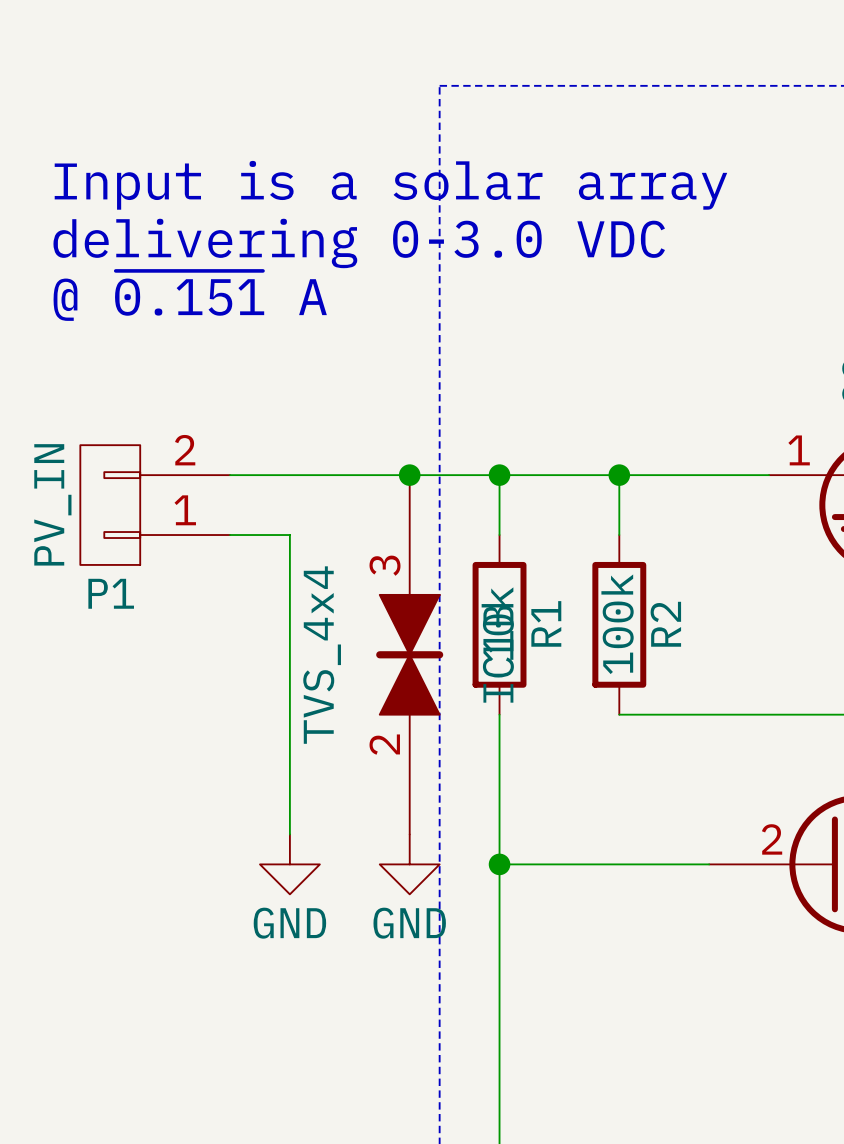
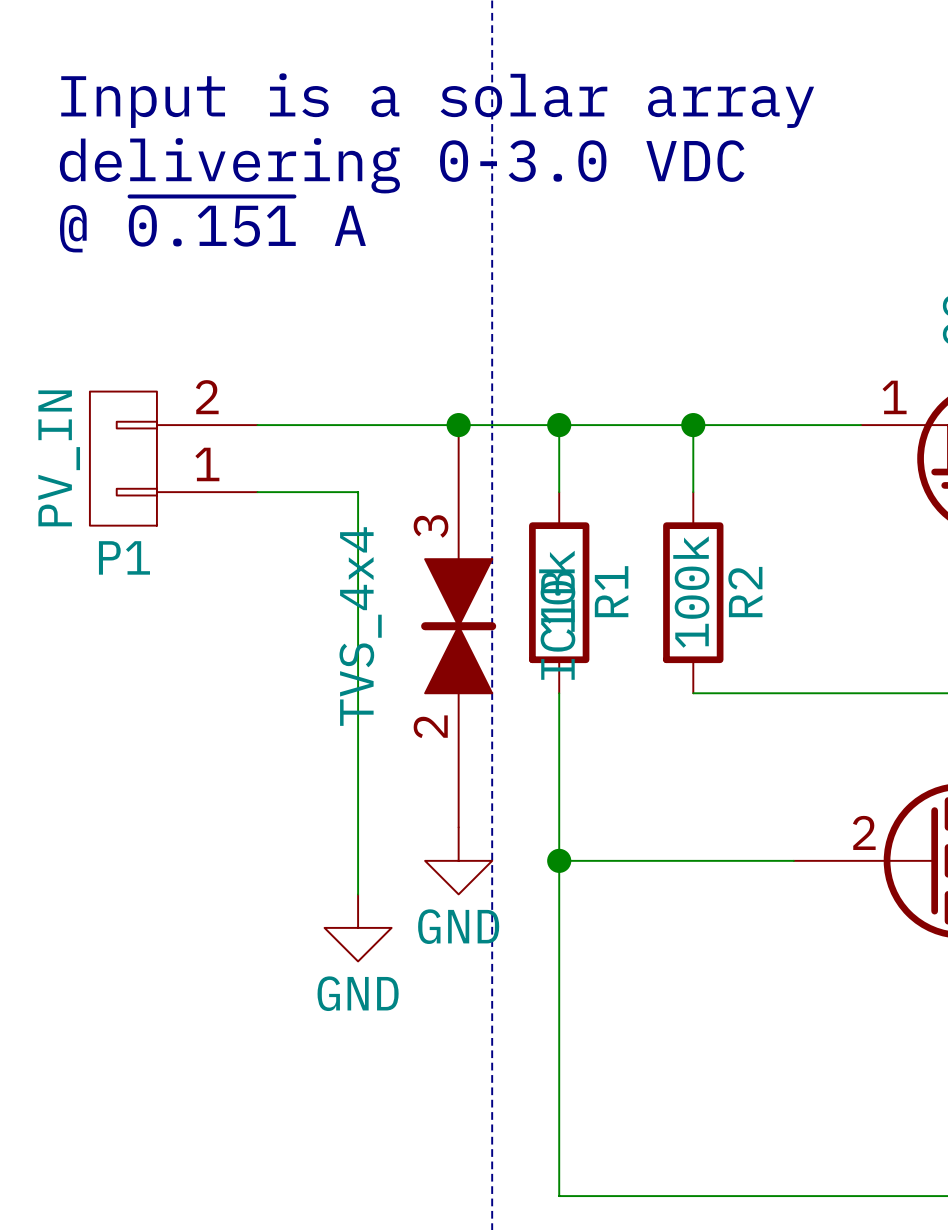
wire: (289, 535) (289, 834) -> (324, 492) (358, 492) (358, 894)
power symbol position: GND (289, 864) -> GND (358, 927)

